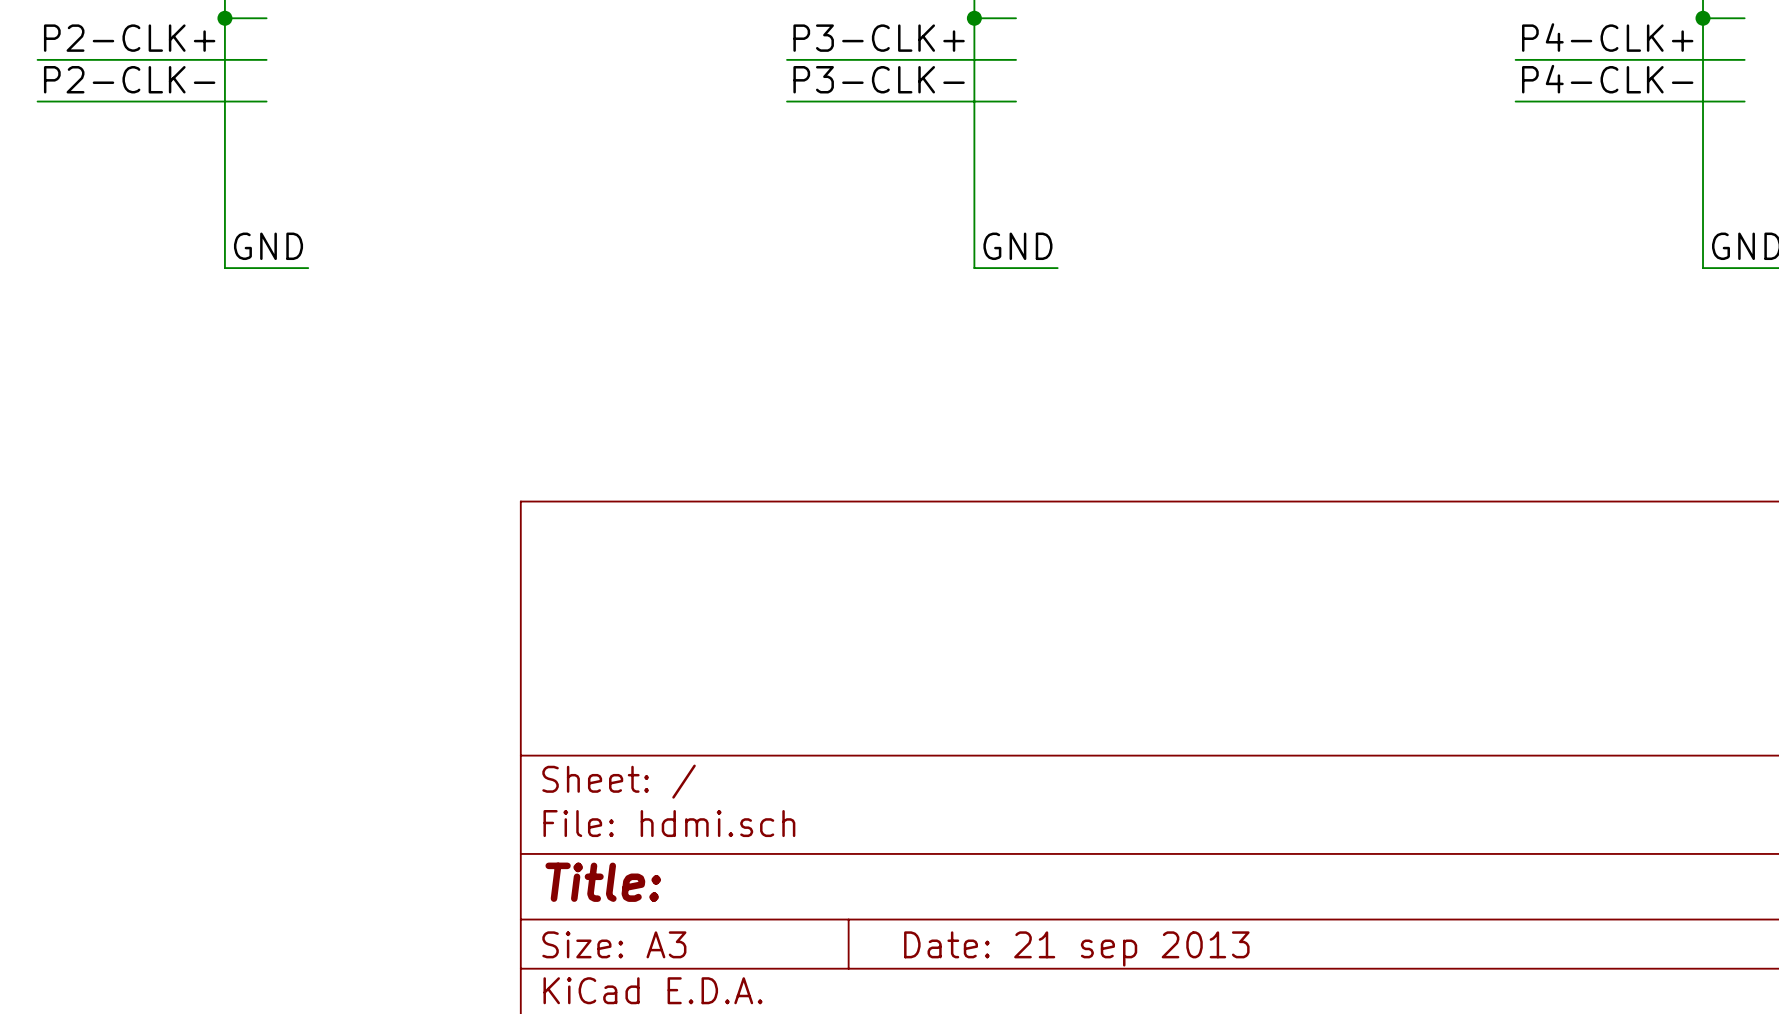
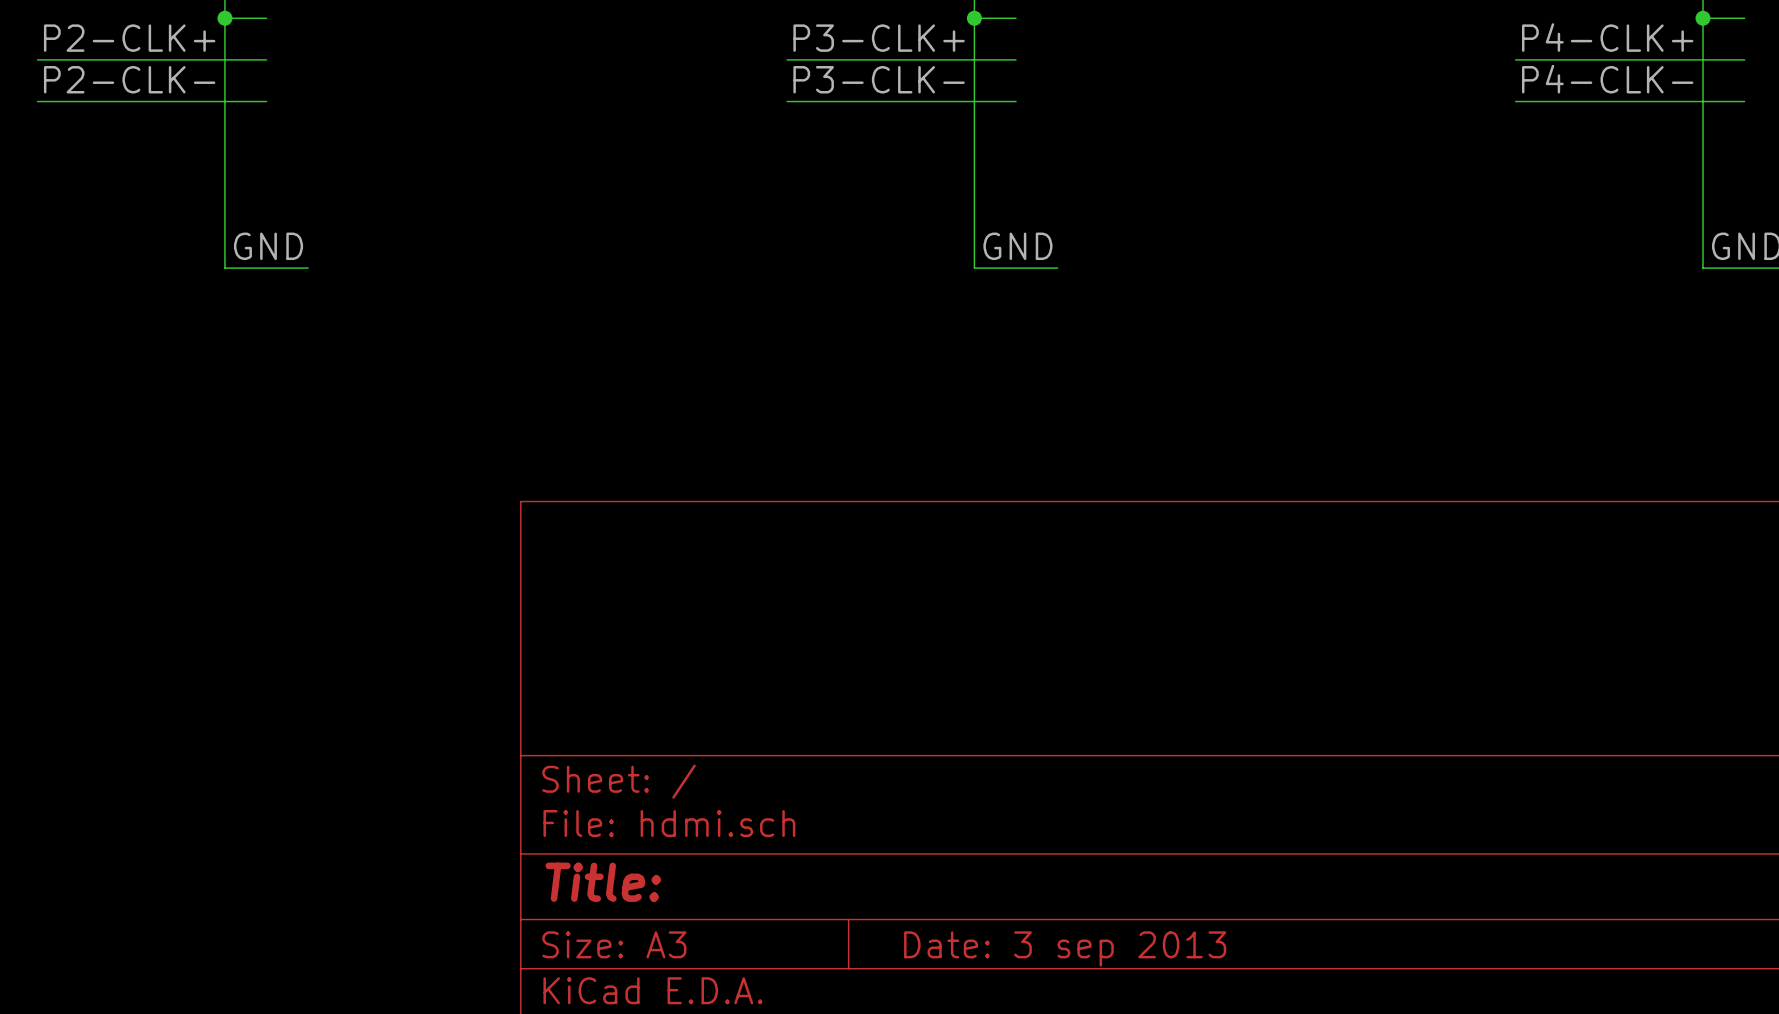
title block: Date: 21 sep 2013 (1076, 948) -> Date: 3 sep 2013 (1065, 948)

